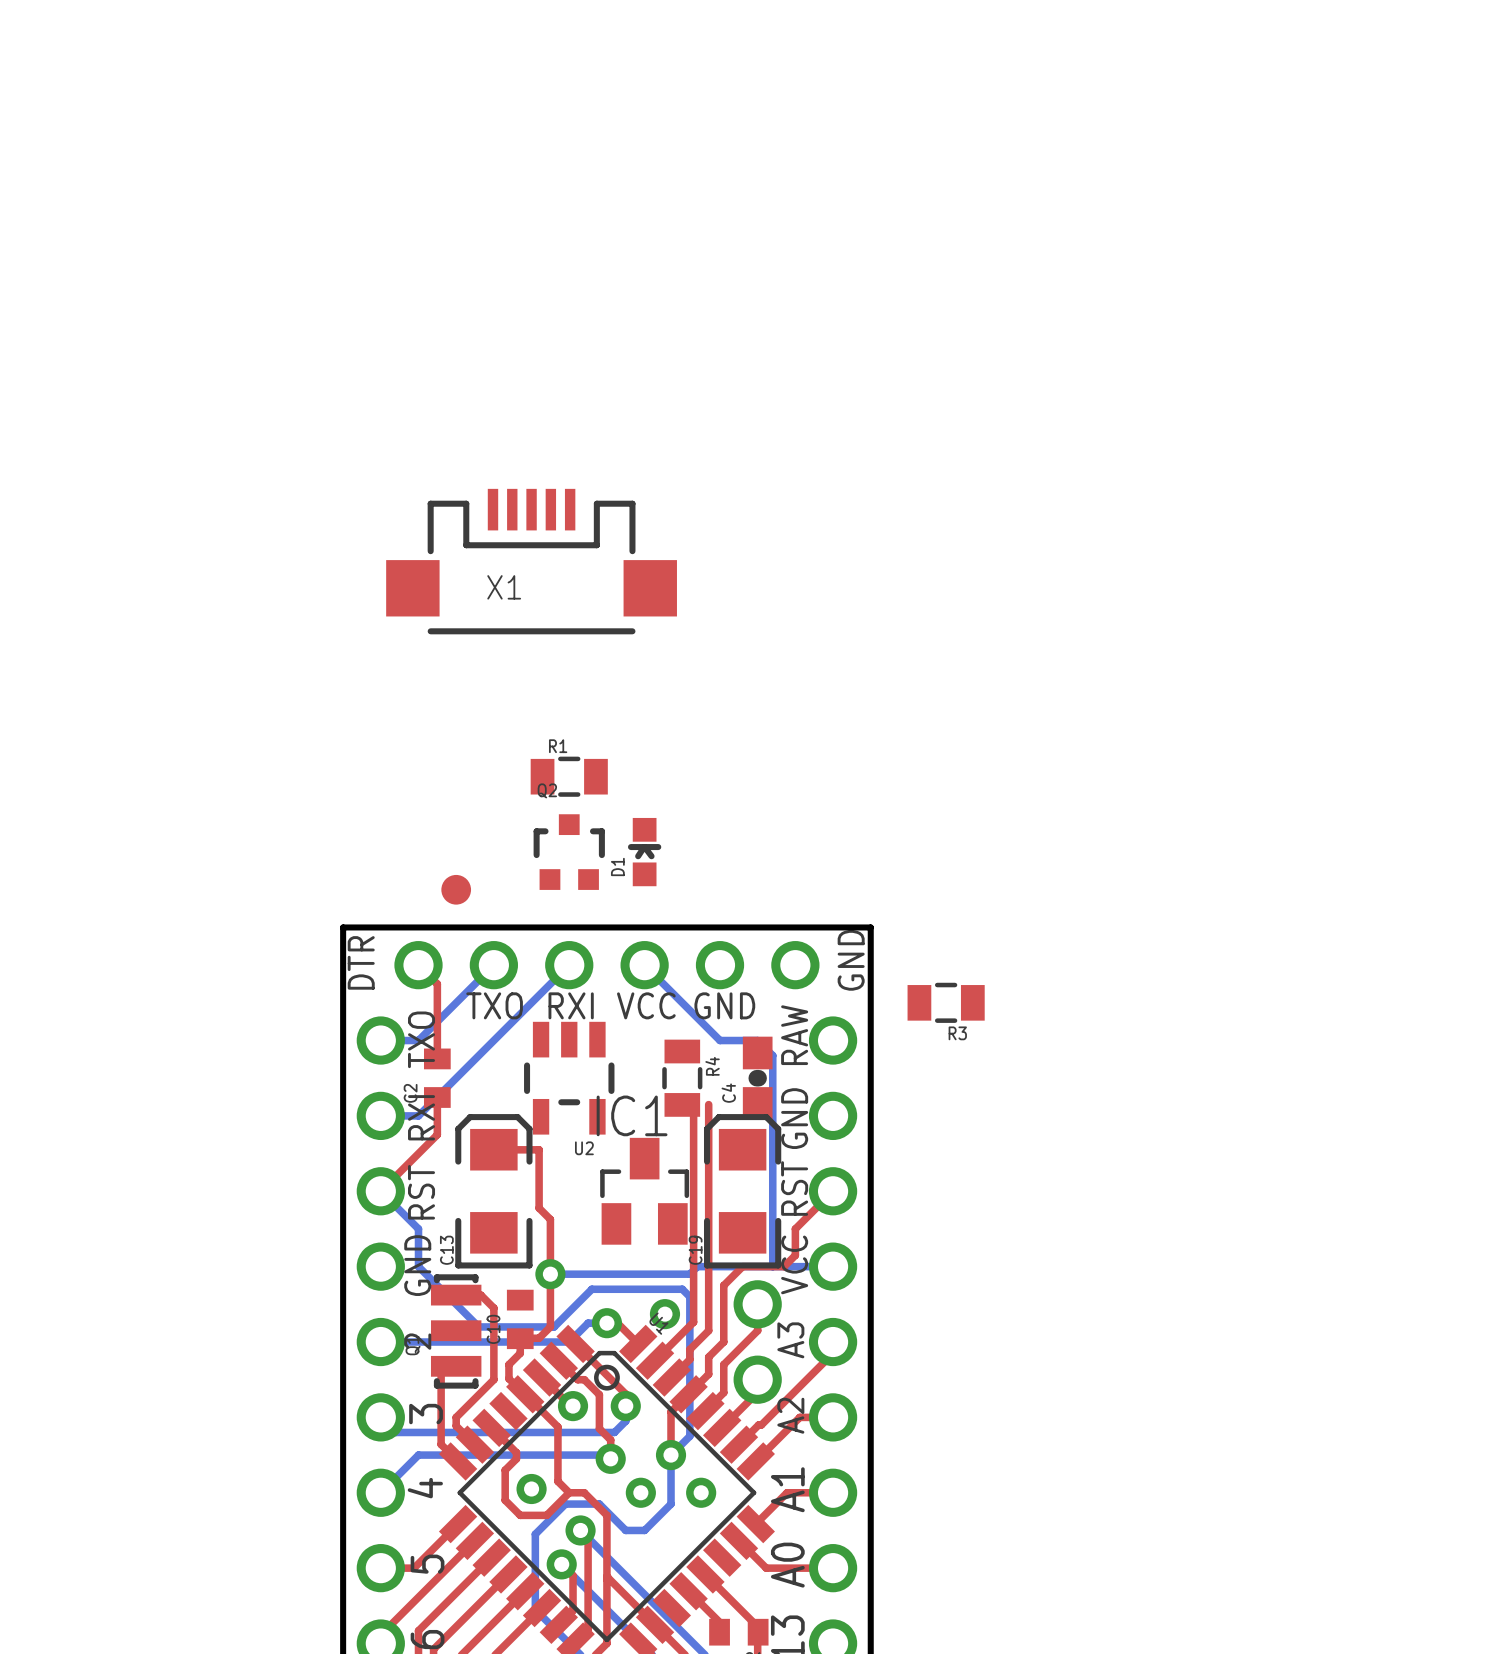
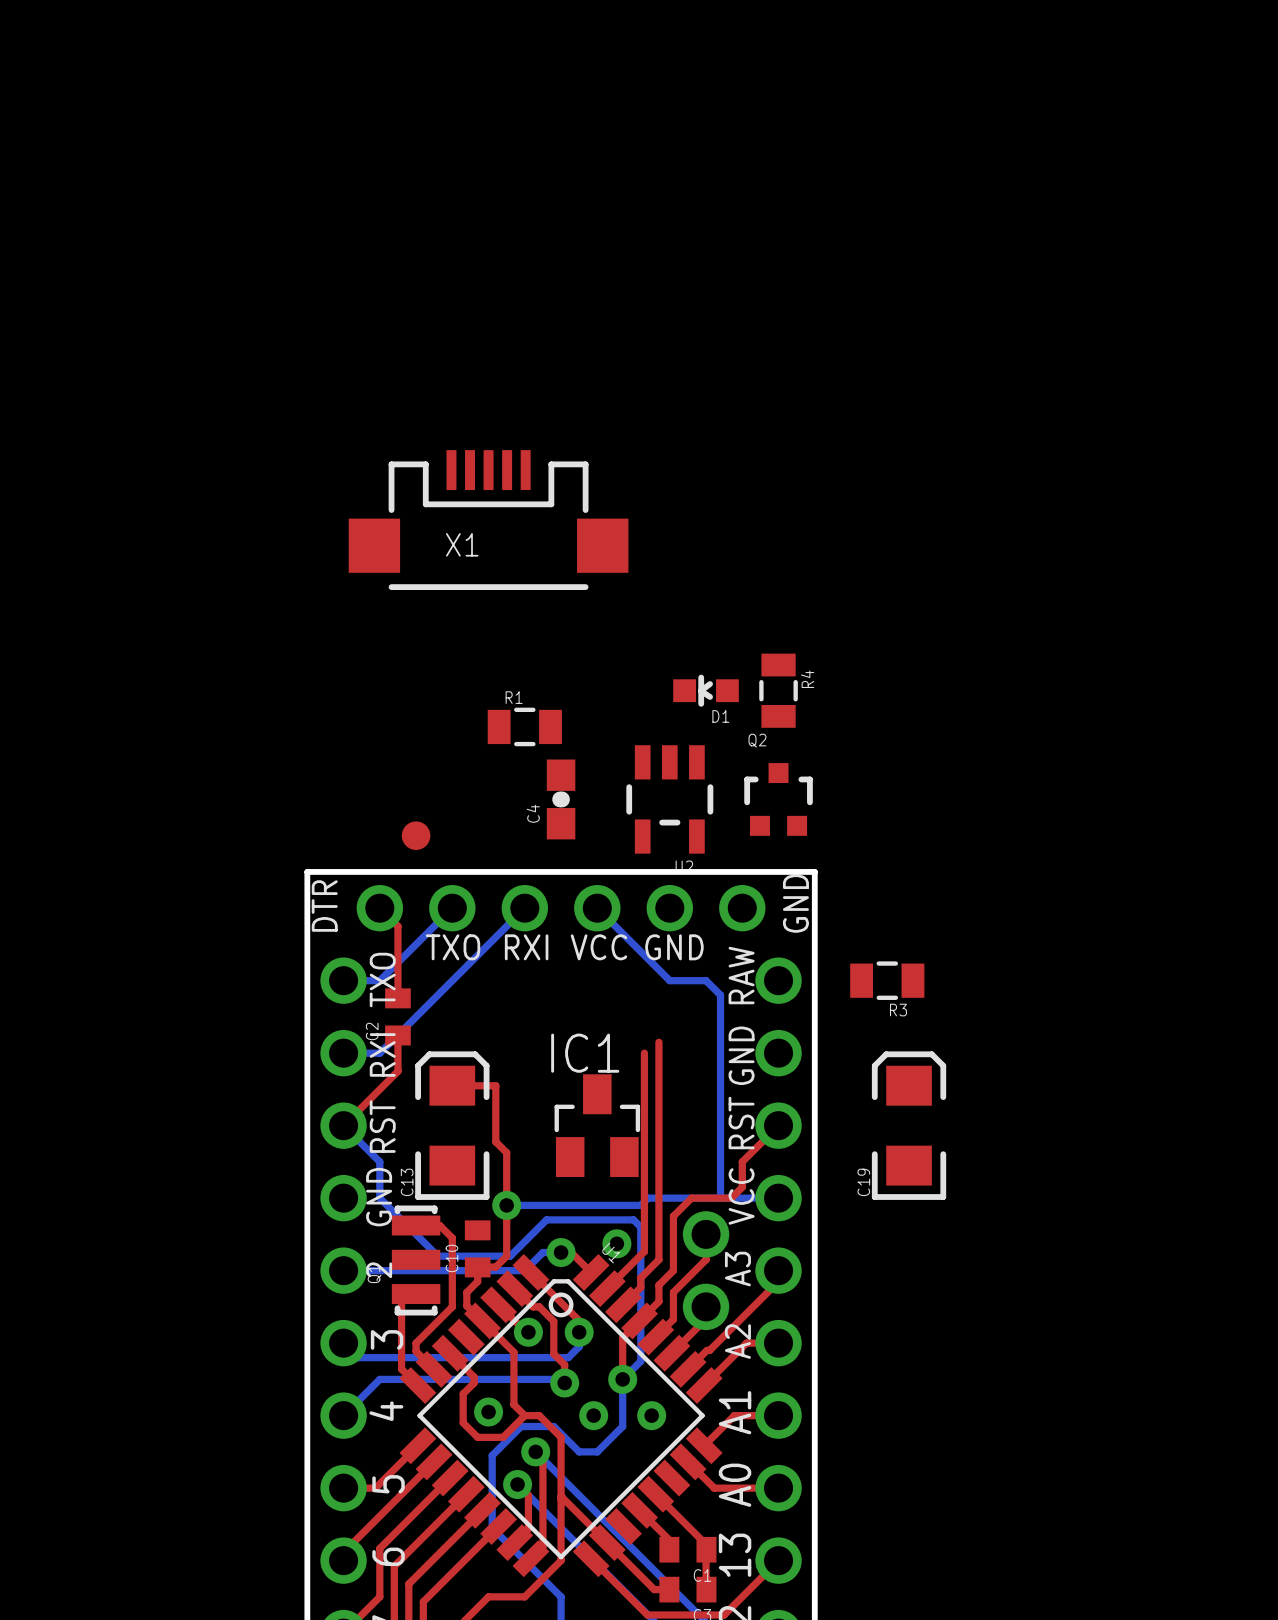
Q2 position: (569, 852) -> (778, 799)
D1 rotation: 0° (644, 852) -> 90° counterclockwise (706, 690)
D1 position: (644, 852) -> (706, 690)
R3 position: (946, 1002) -> (887, 980)
U2 position: (569, 1078) -> (669, 799)
R4 position: (682, 1078) -> (778, 690)
C4 position: (757, 1078) -> (561, 799)
C19 position: (742, 1191) -> (909, 1125)

